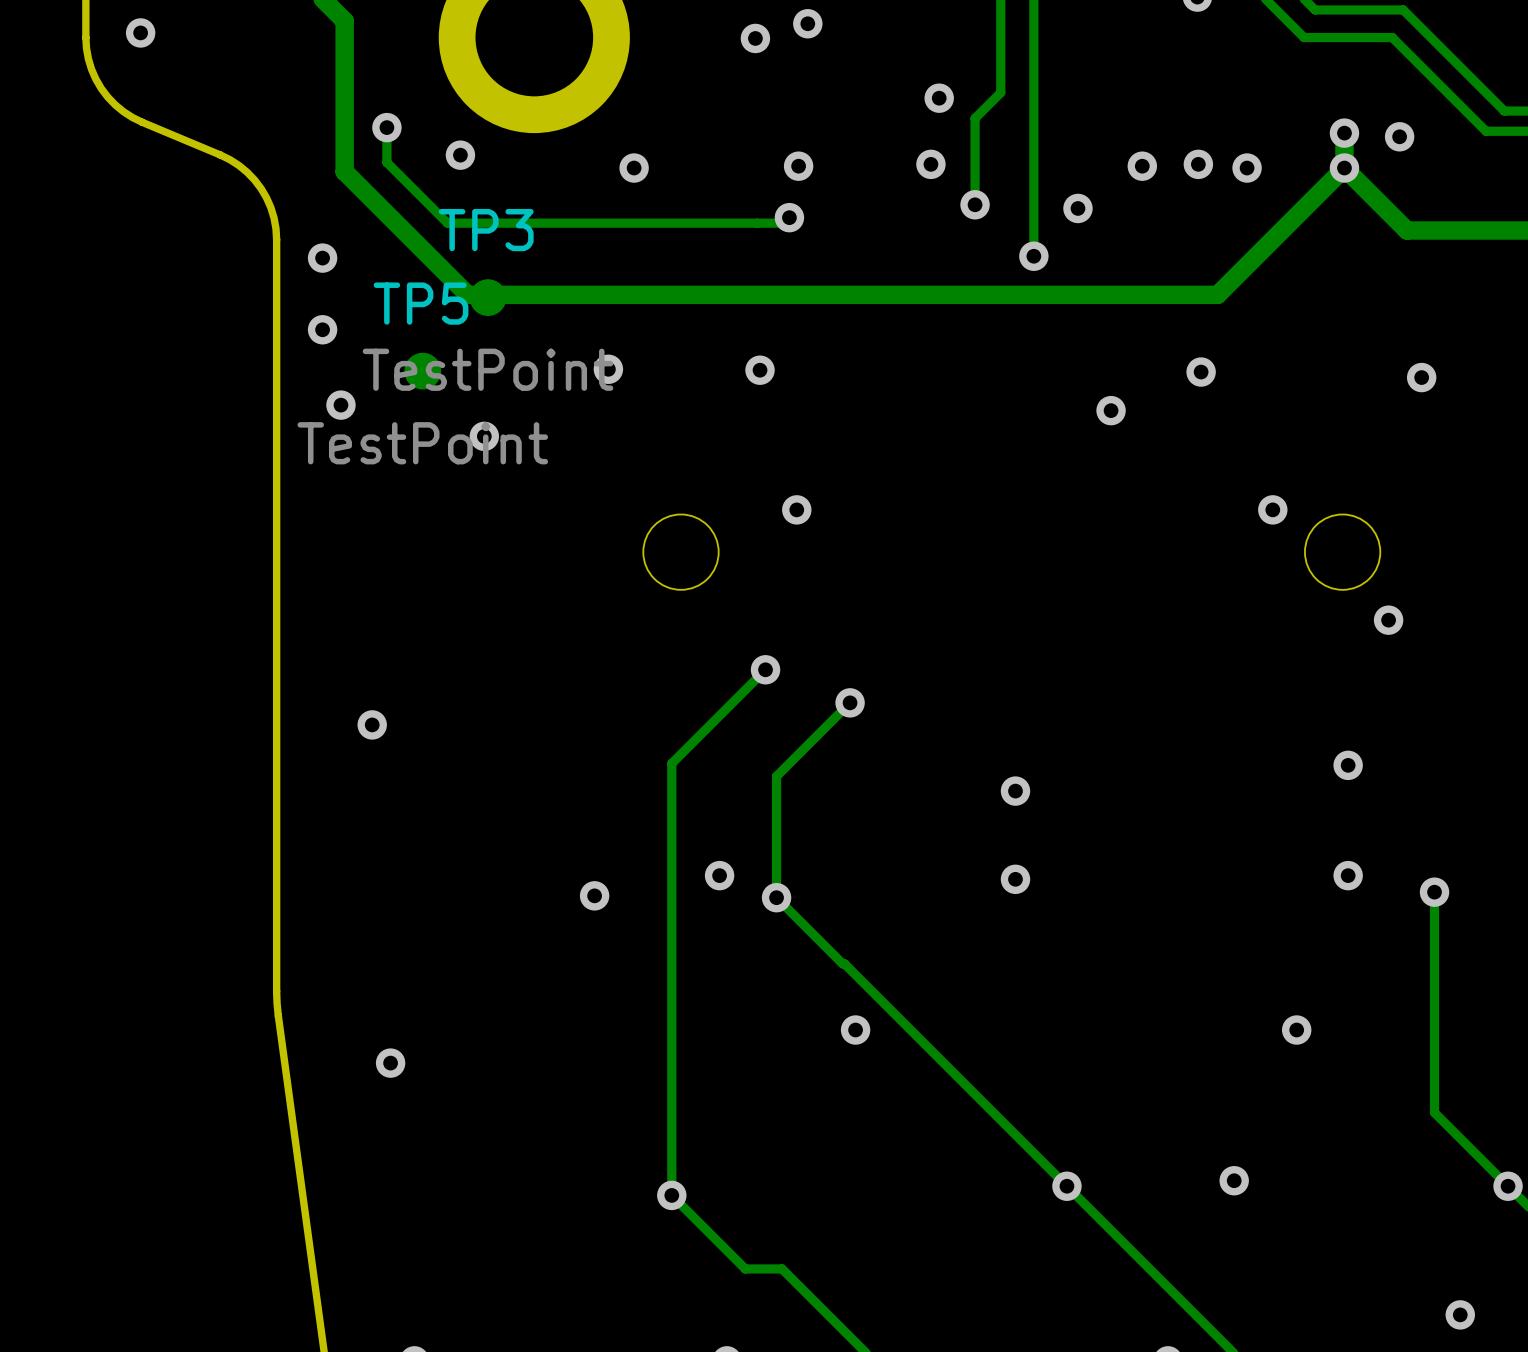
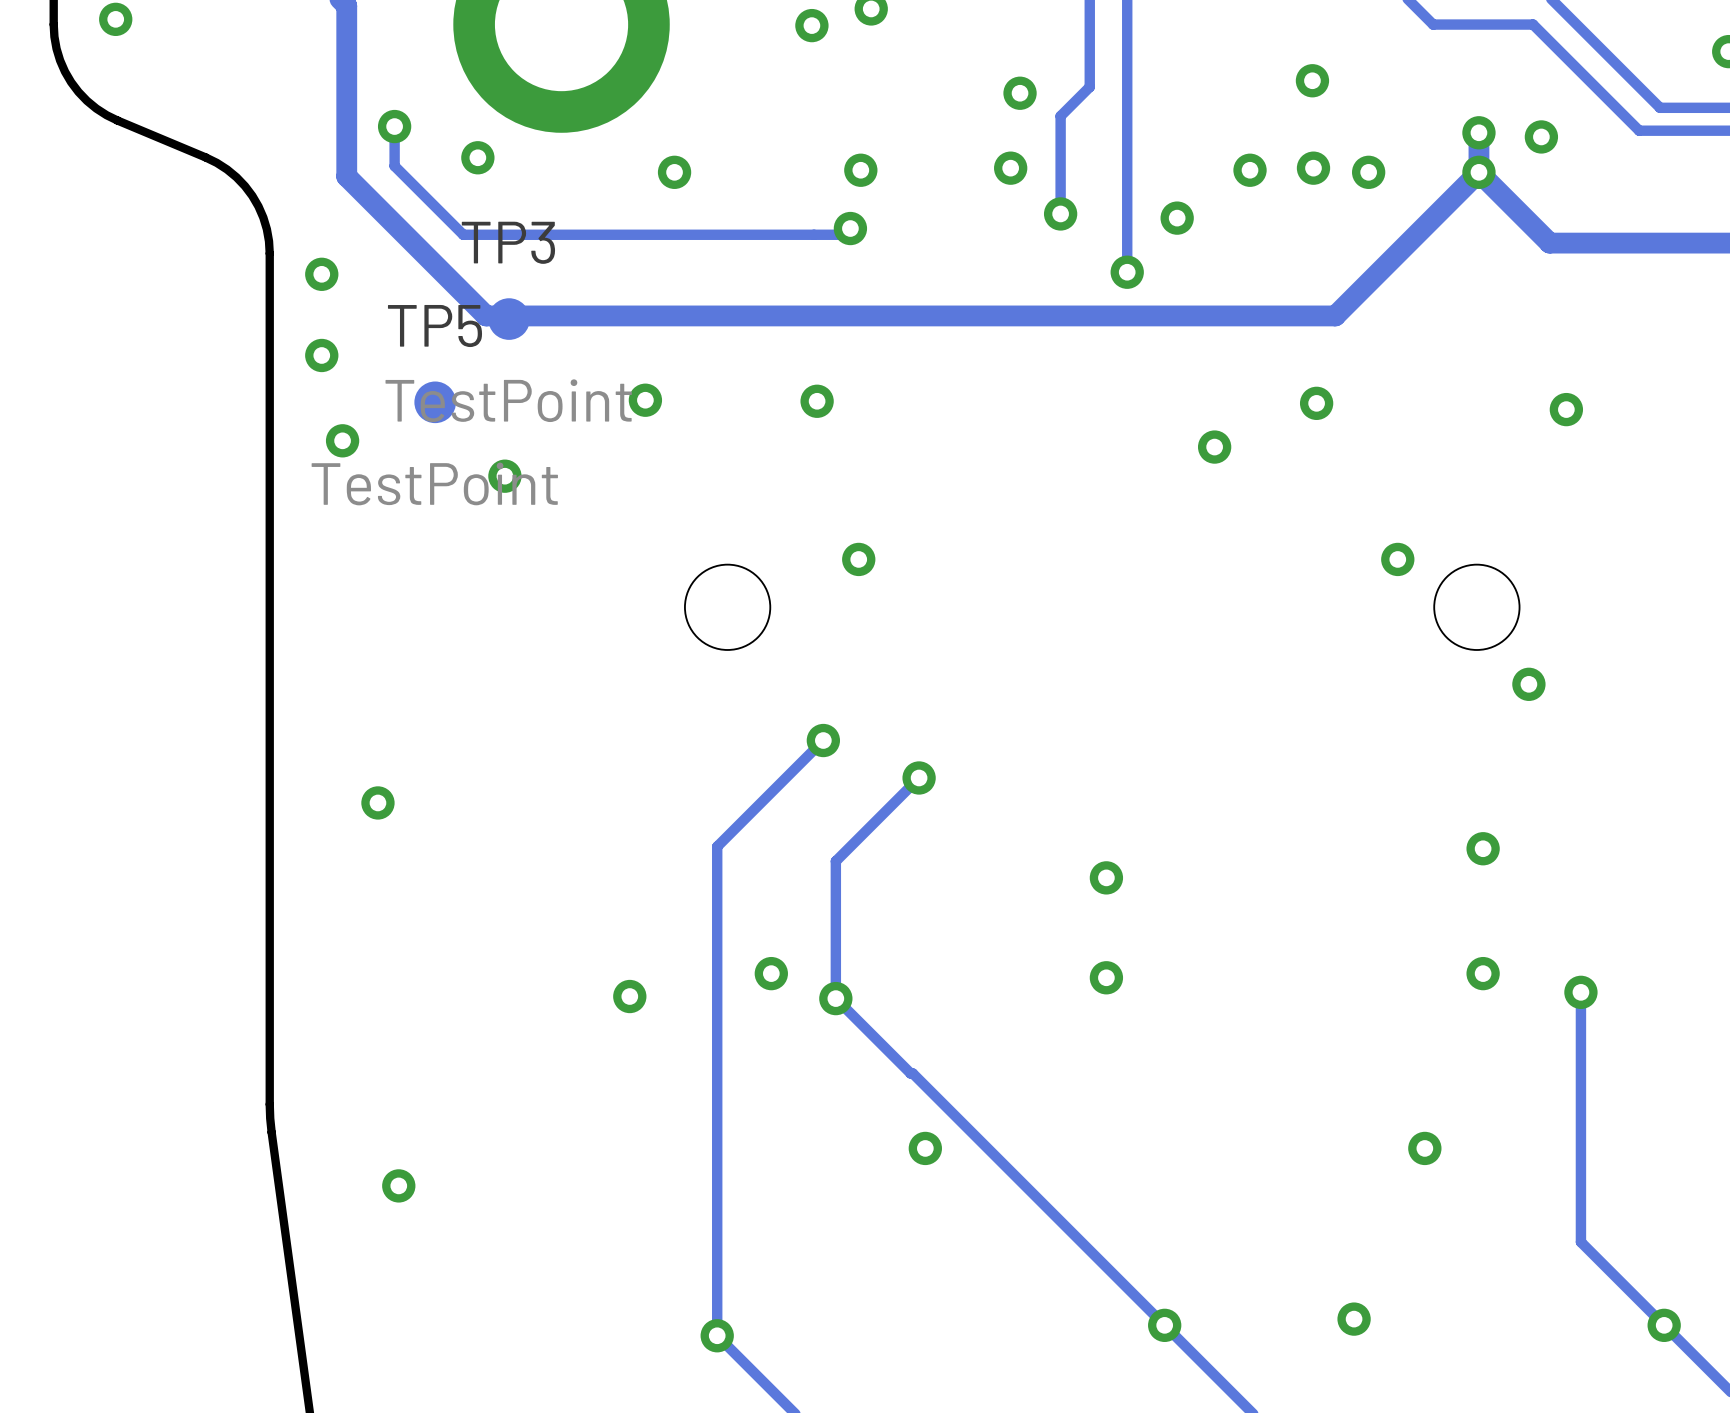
via: none -> (1312, 80)

